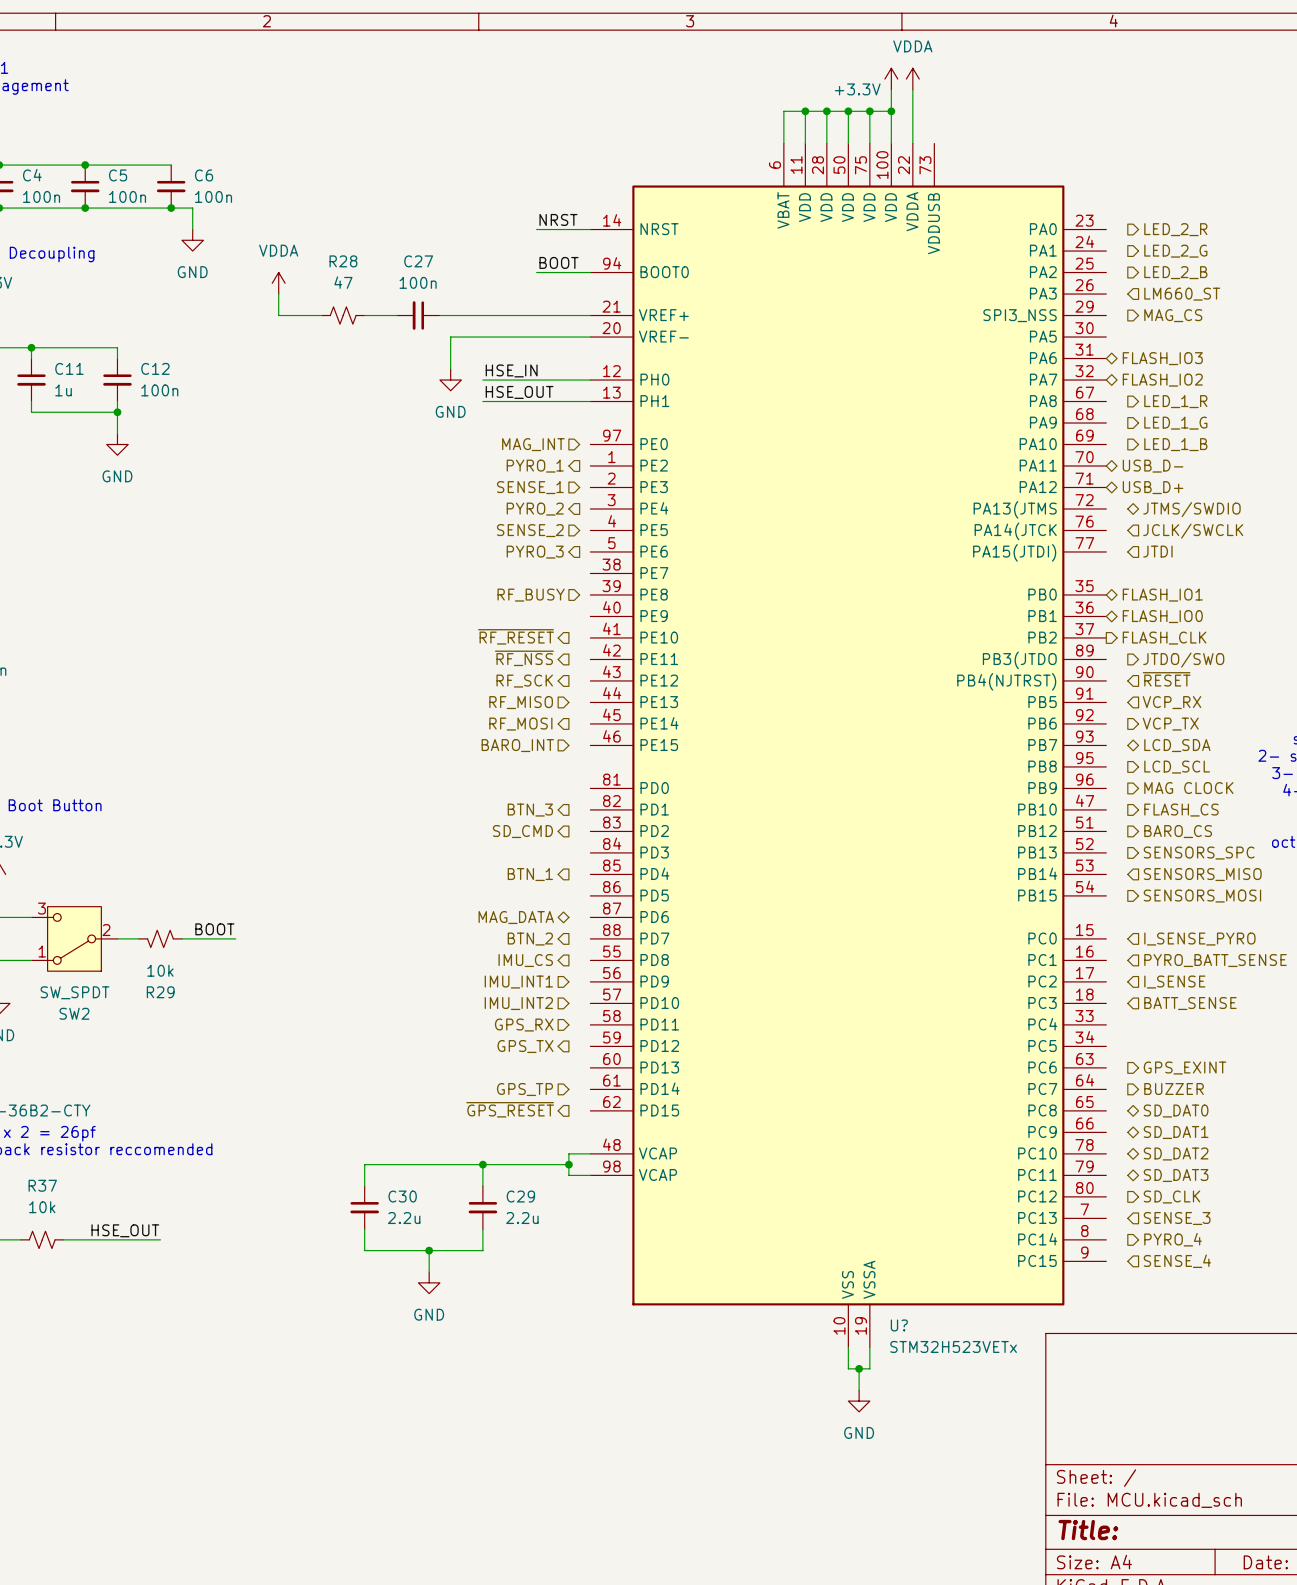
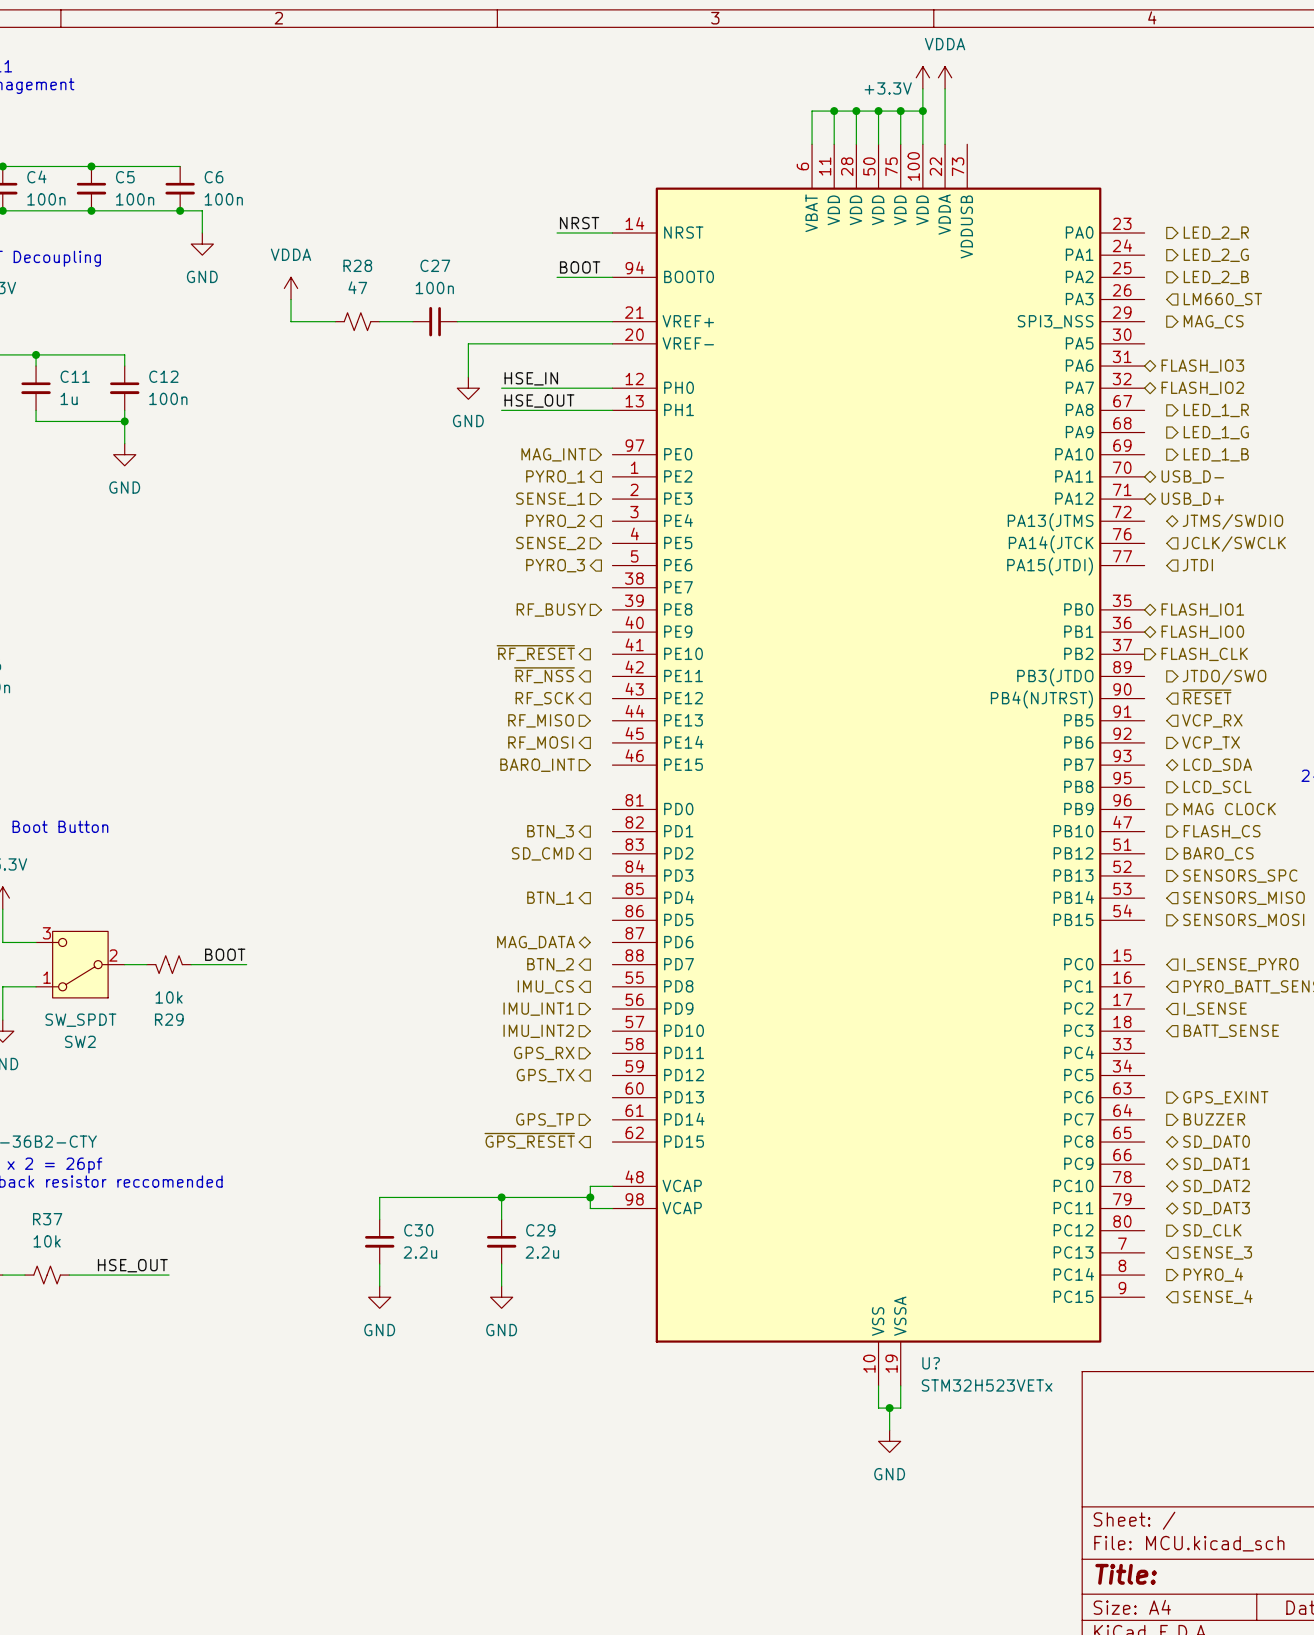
wire: (364, 1250) (482, 1250) -> none
wire: (429, 1250) (429, 1272) -> none
junction: (429, 1250) -> none
power symbol: none -> GND (379, 1297)
power symbol: none -> GND (501, 1297)
power symbol: GND (429, 1282) -> none

